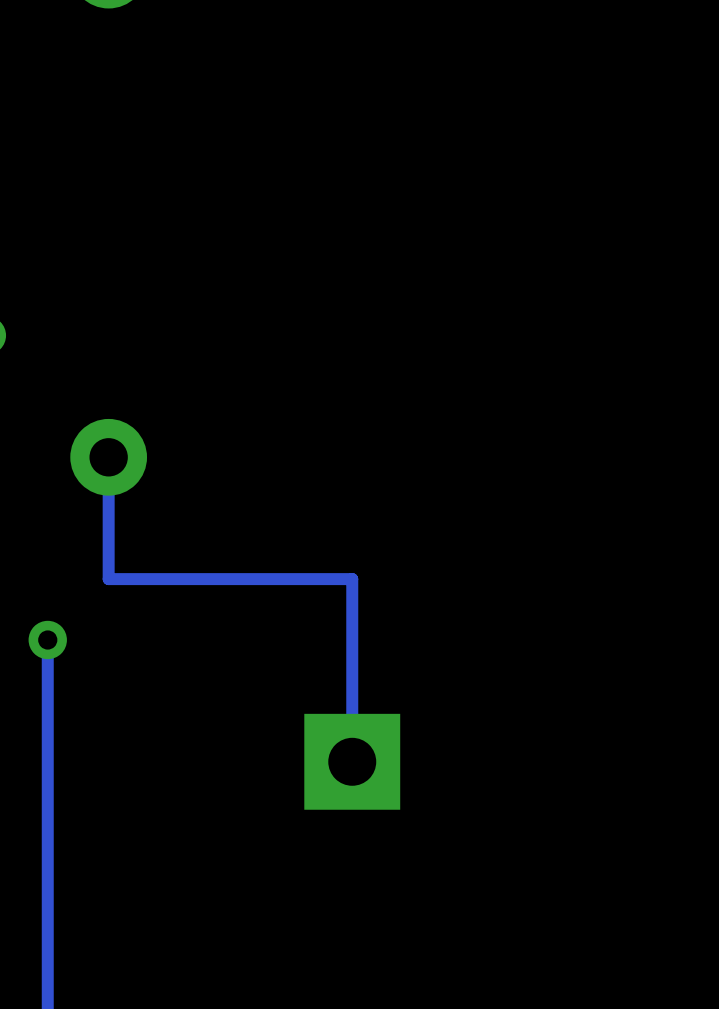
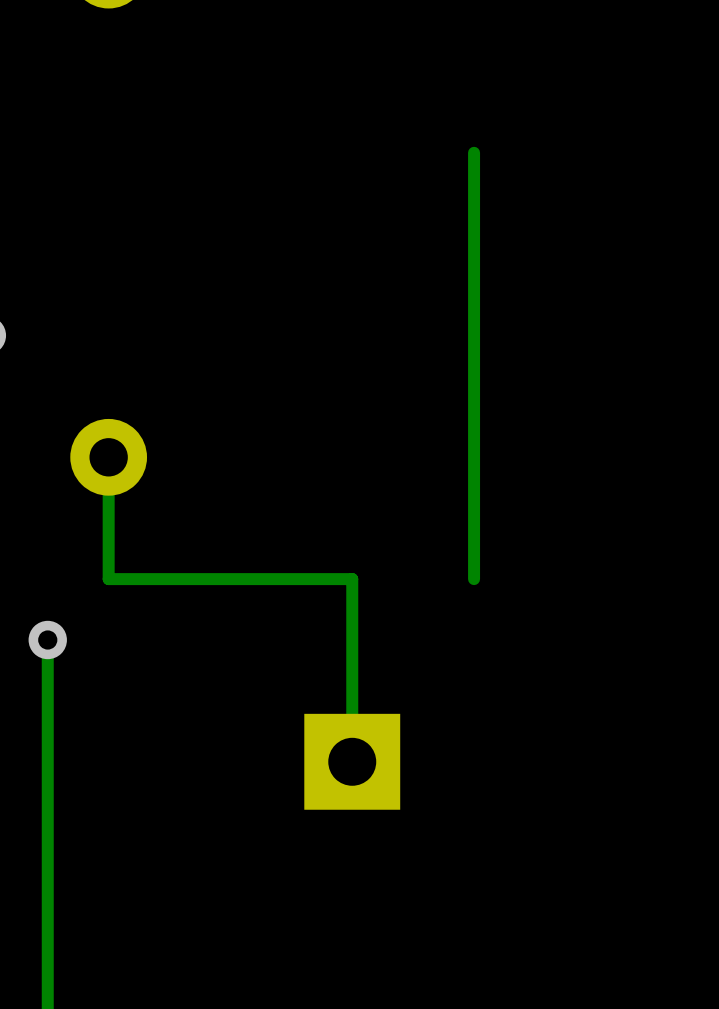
track: none -> (474, 152) (474, 579)

